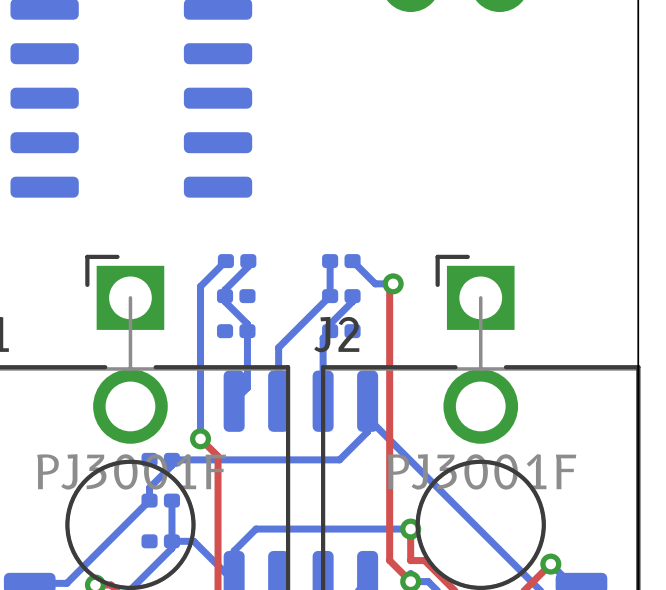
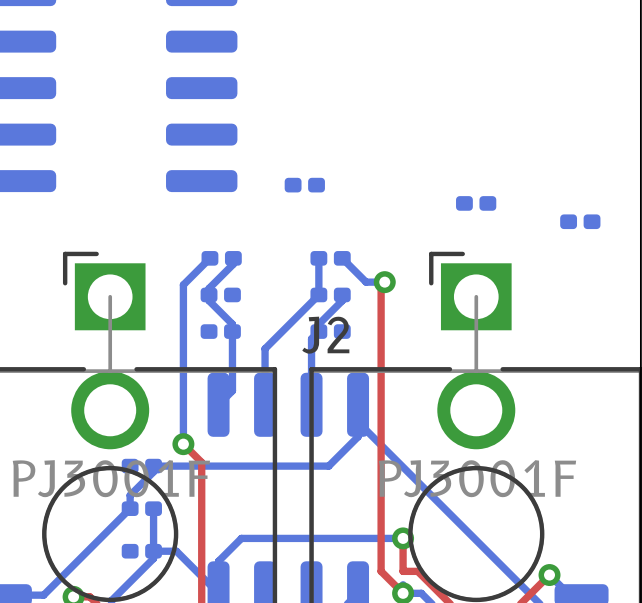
part: none -> (304, 185)
part: none -> (476, 203)
part: none -> (580, 221)

